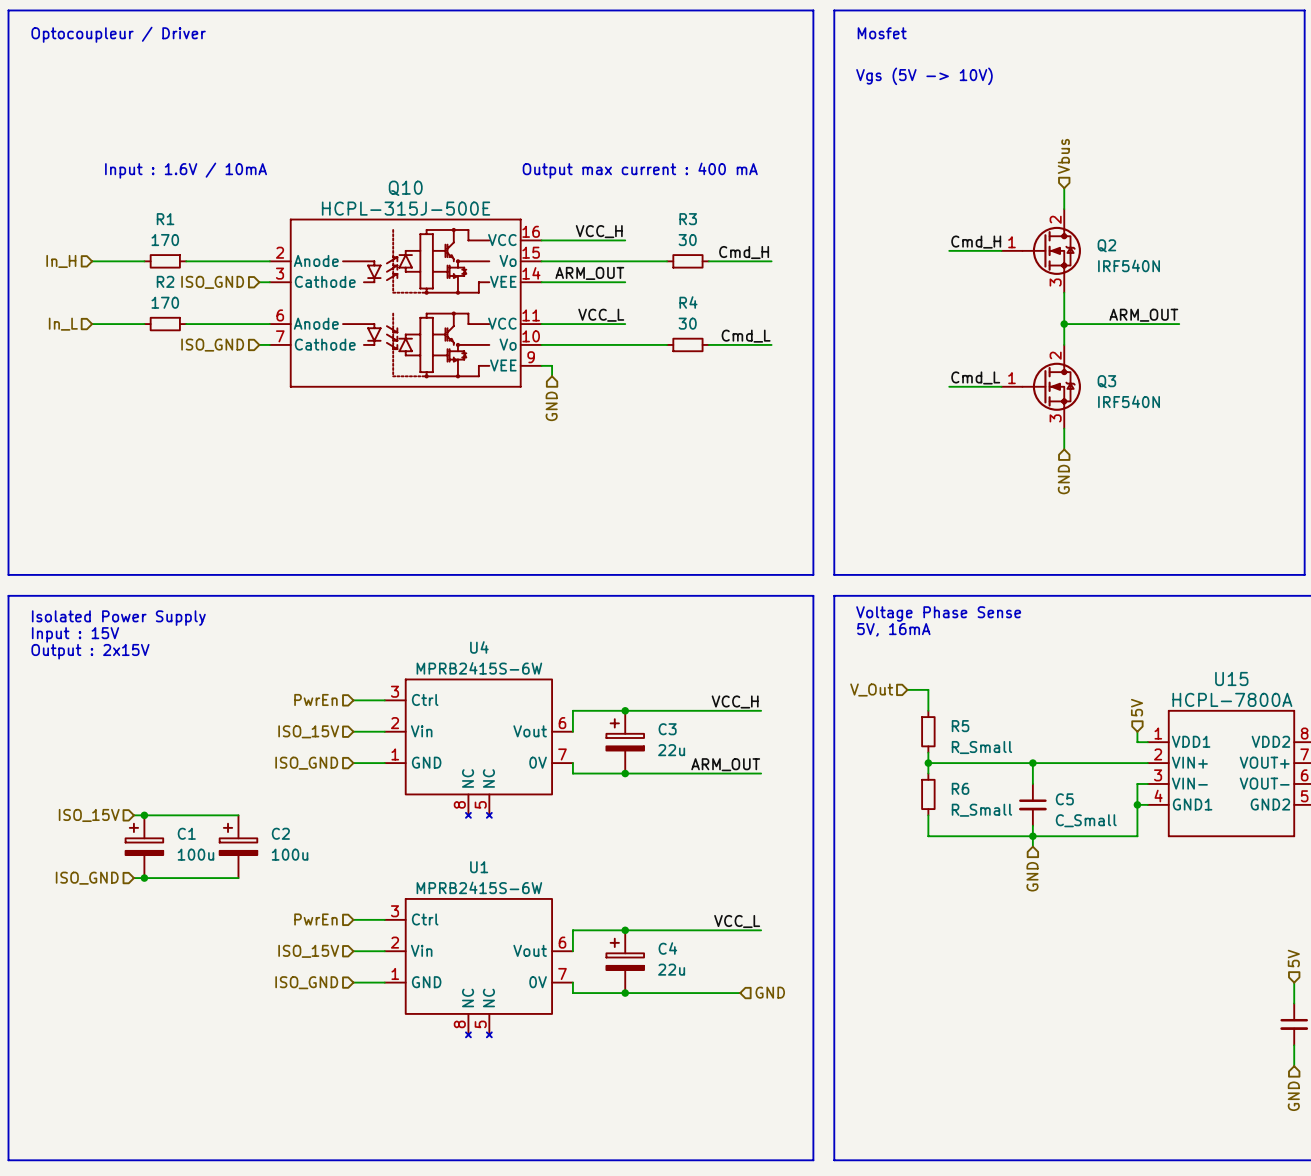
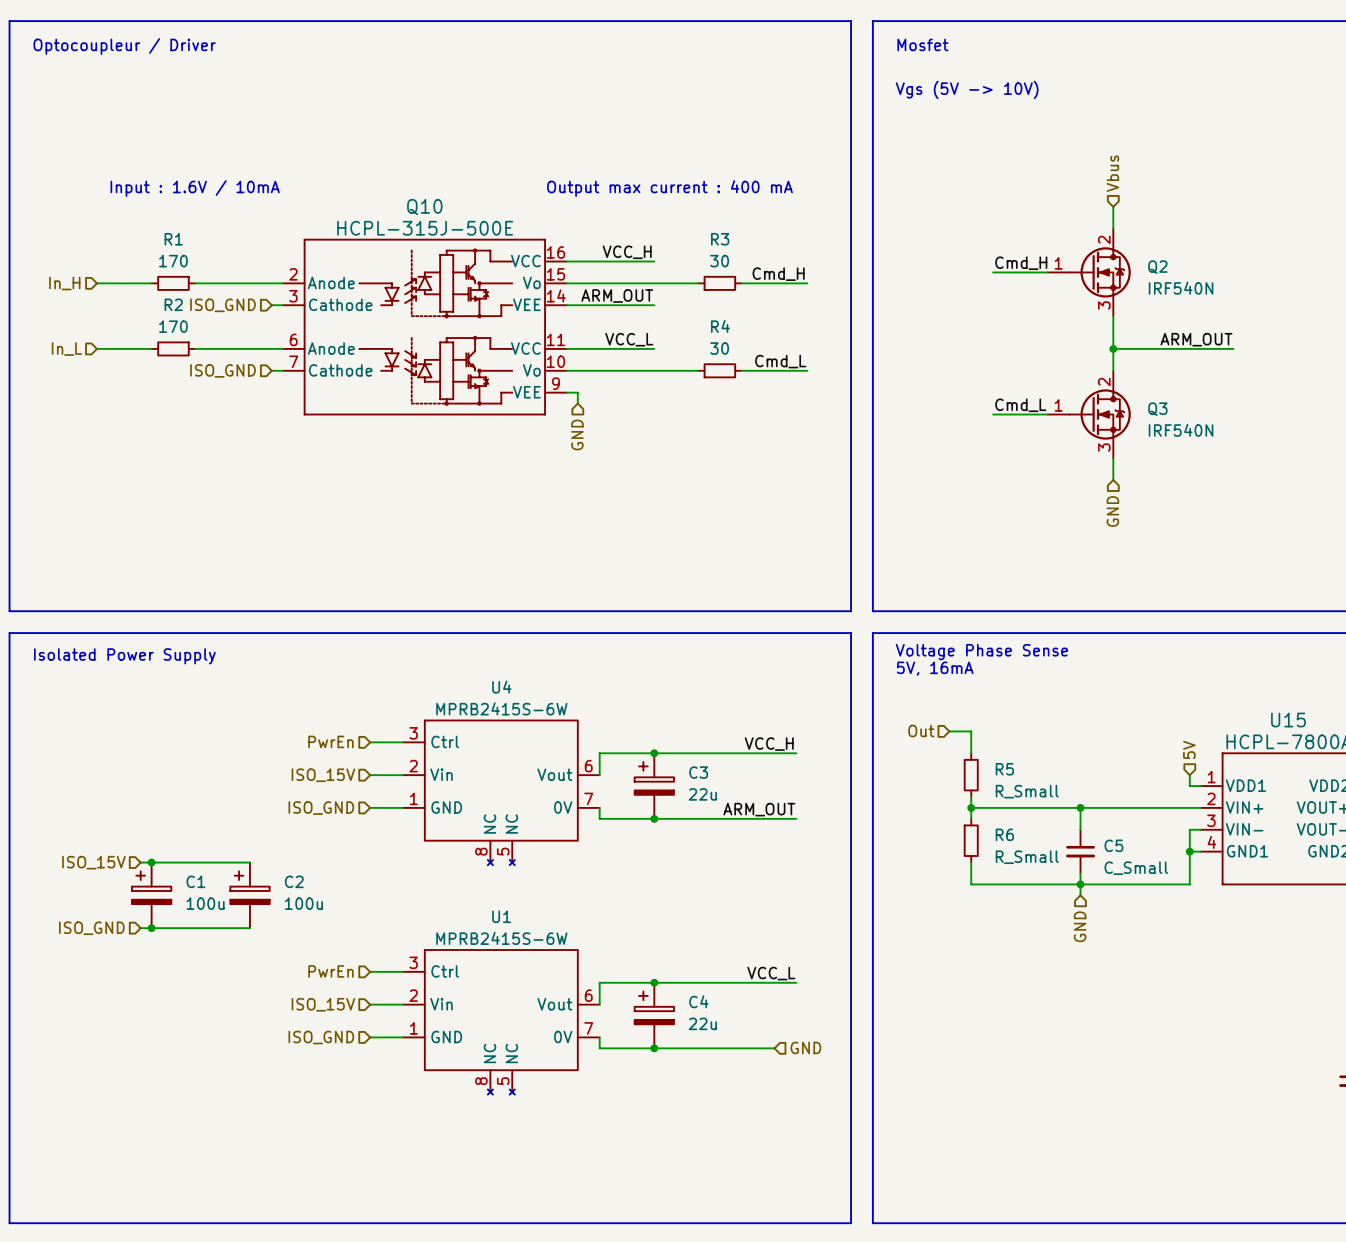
text: Input : 15V (75, 634) -> none
text: Output : 2x15V (90, 651) -> none
hierarchical label: V_Out (871, 690) -> Out (921, 731)

